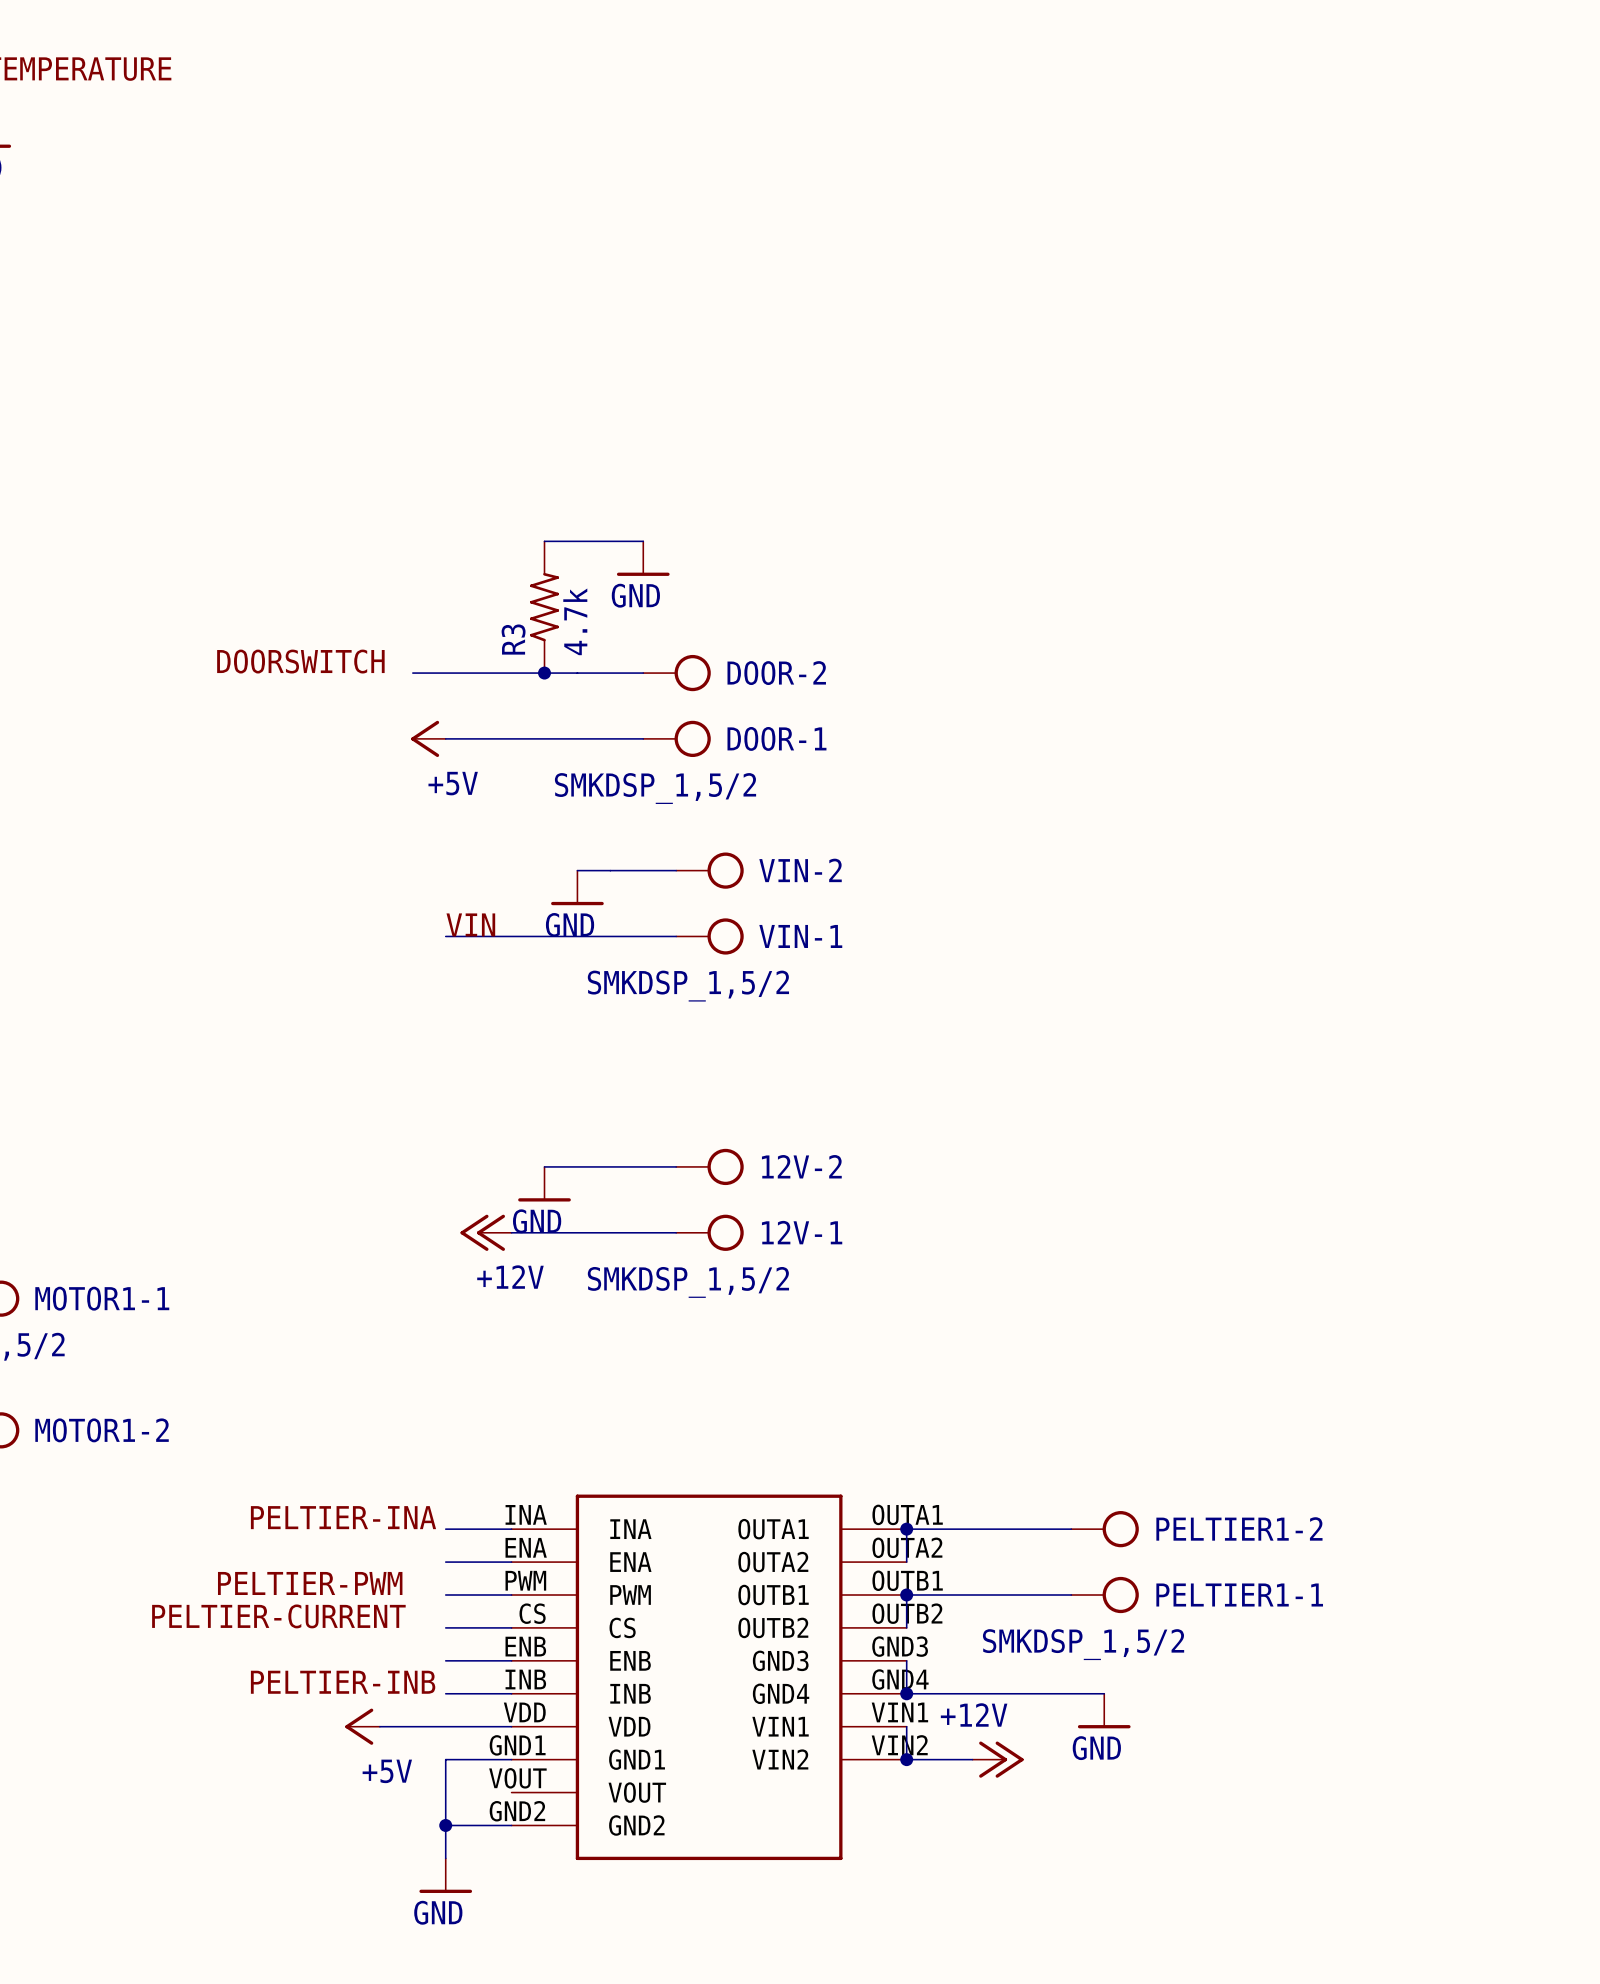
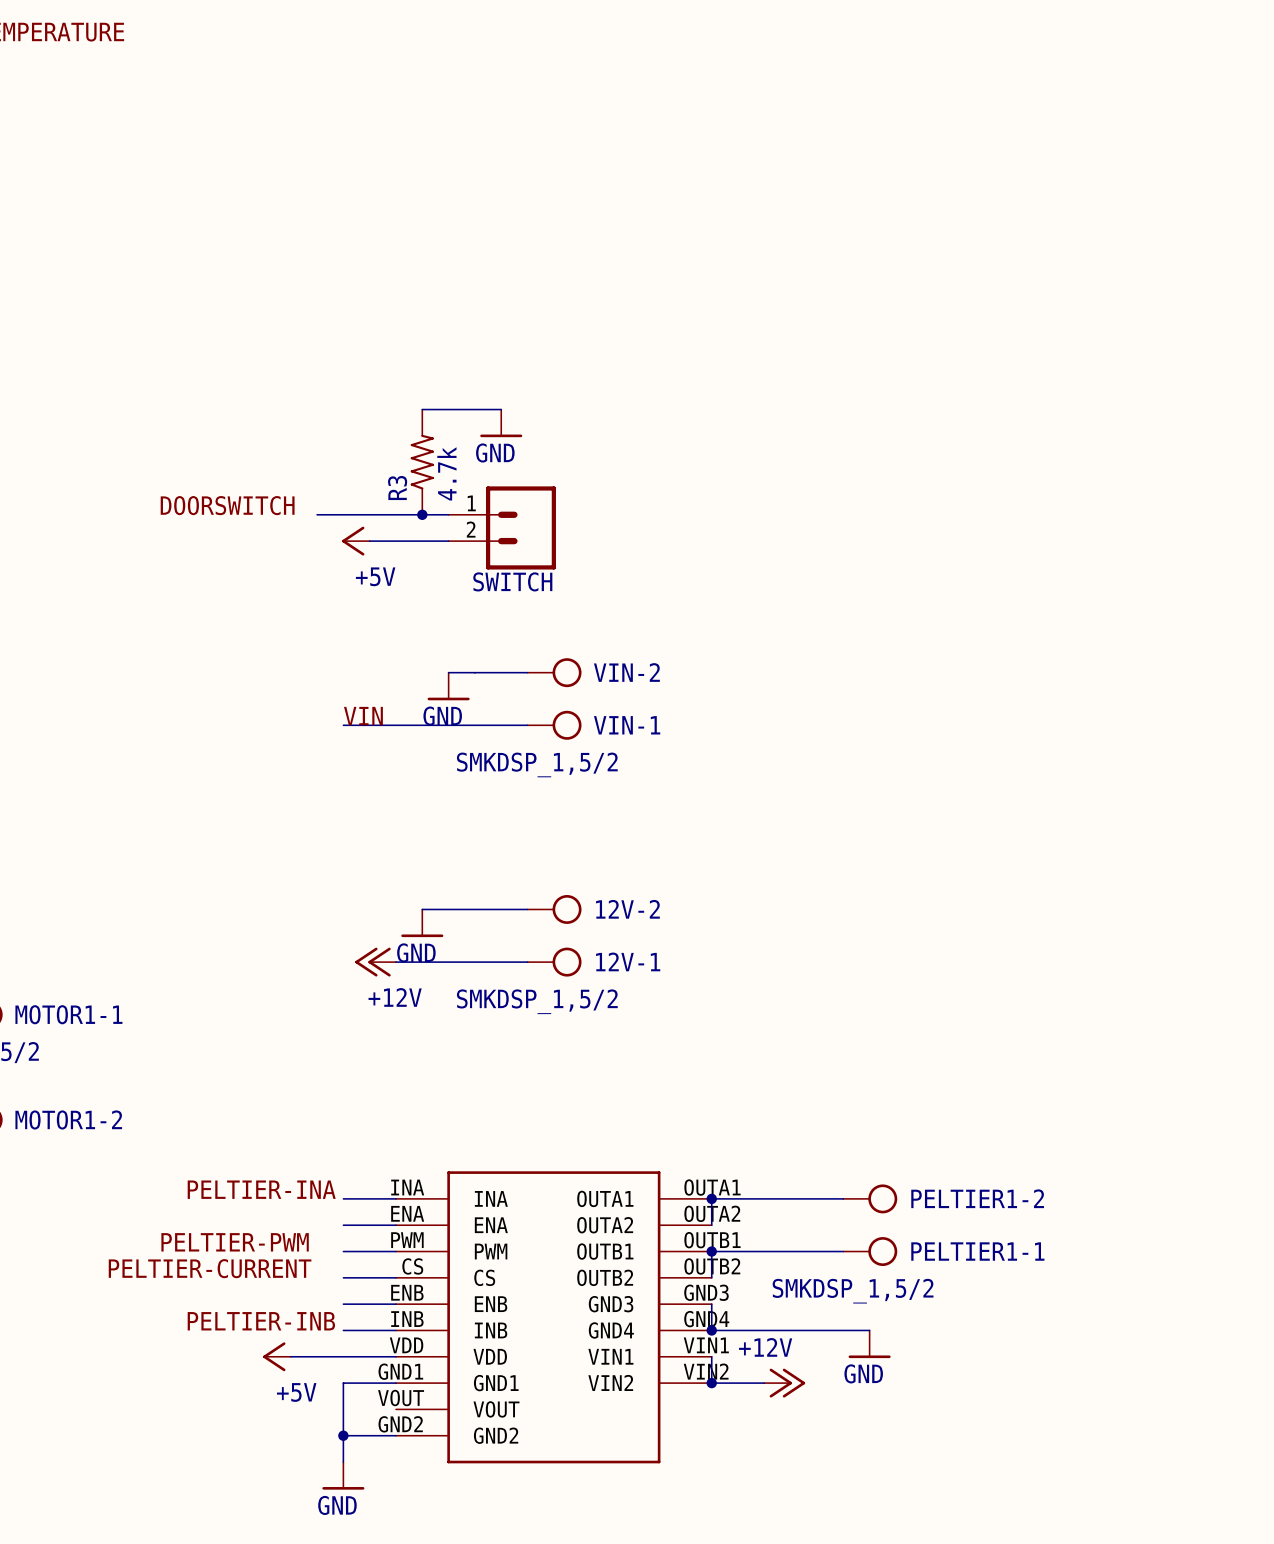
DOOR-2: (677, 673) -> none
SWITCH: none -> (502, 527)
wire: none -> (369, 541) (448, 541)
power symbol position: +5V (428, 738) -> +5V (355, 541)
wire: (445, 738) (643, 738) -> none
DOOR-1: SMKDSP_1,5/2 (677, 738) -> none

